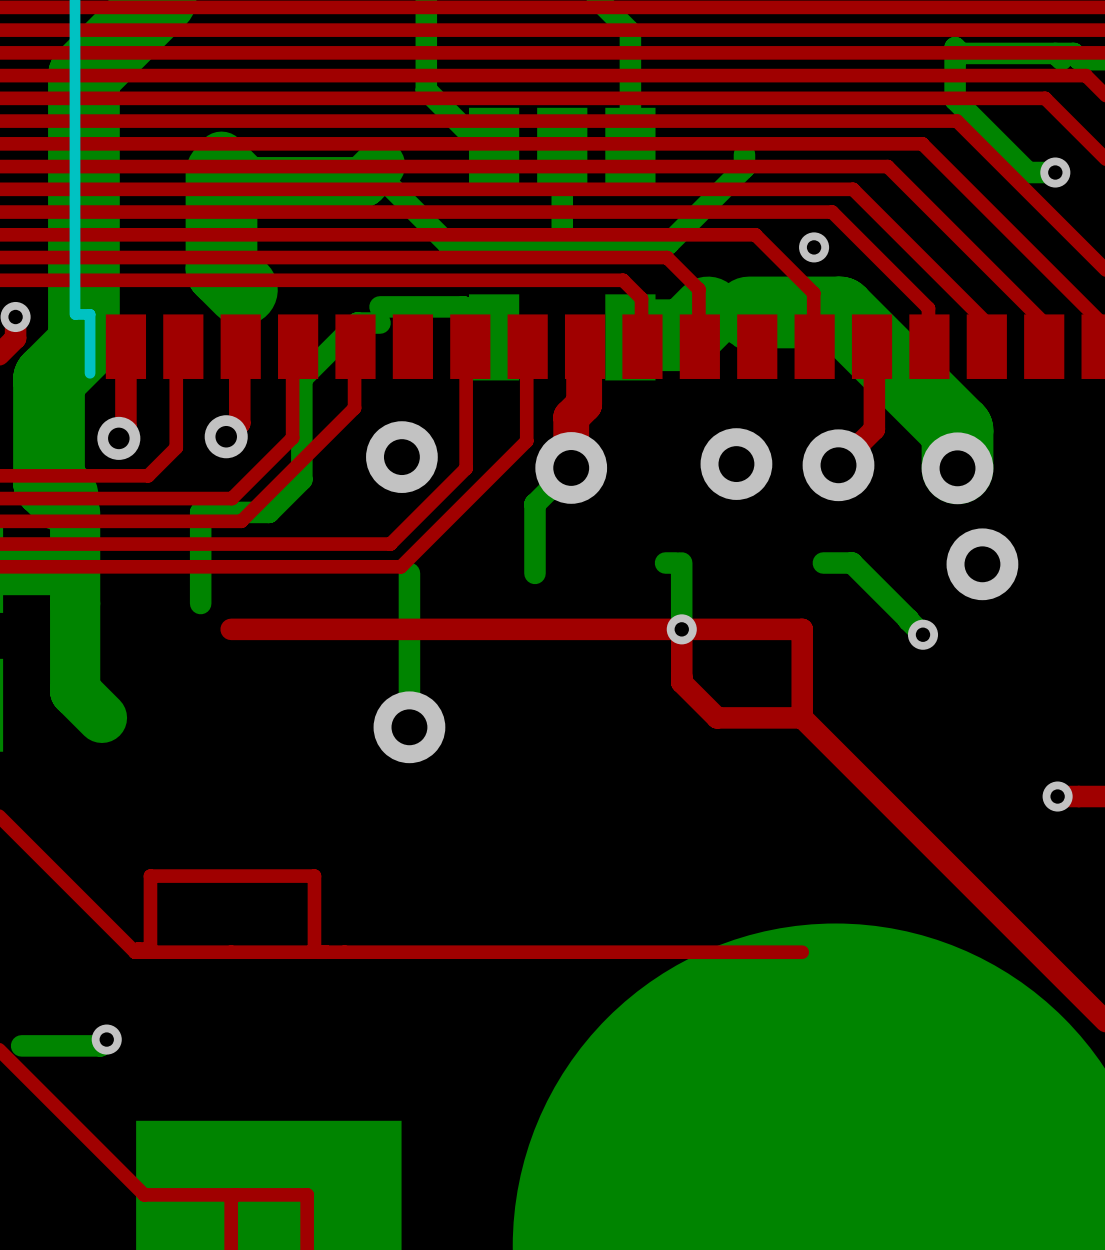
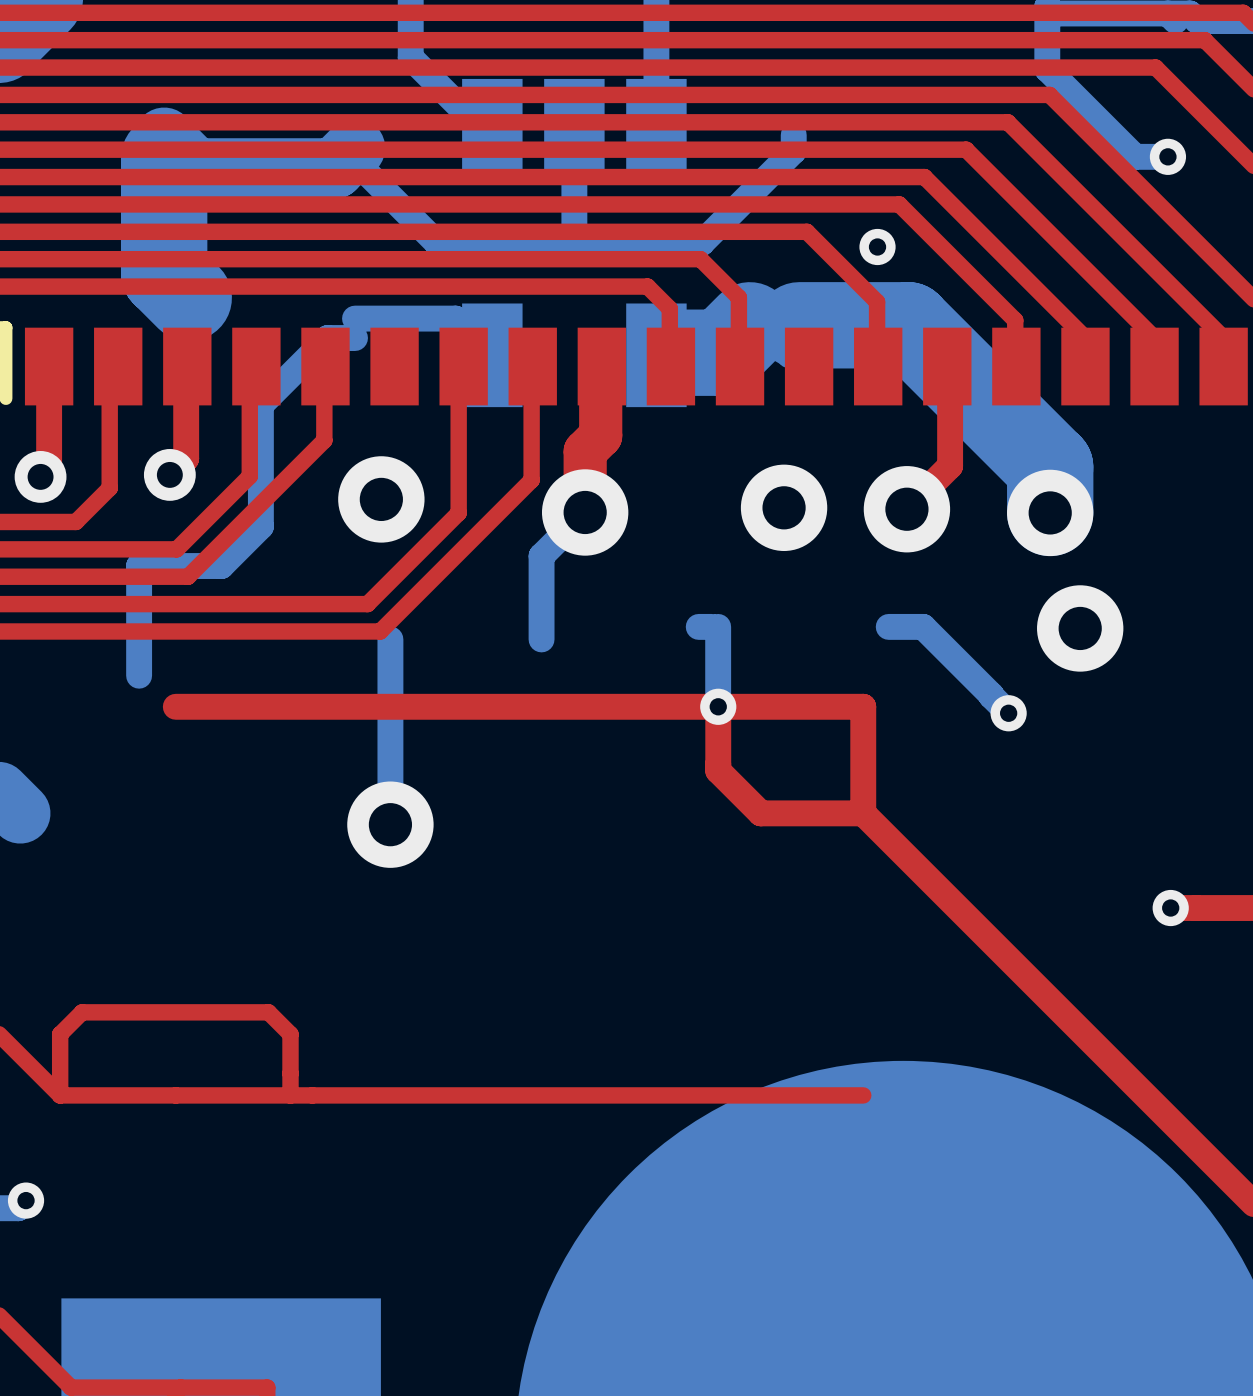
top track: (135, 952) (138, 948) (150, 948) (150, 876) (314, 876) (314, 948) (317, 952) -> (60, 1095) (60, 1034) (82, 1012) (268, 1012) (290, 1034) (290, 1095)

